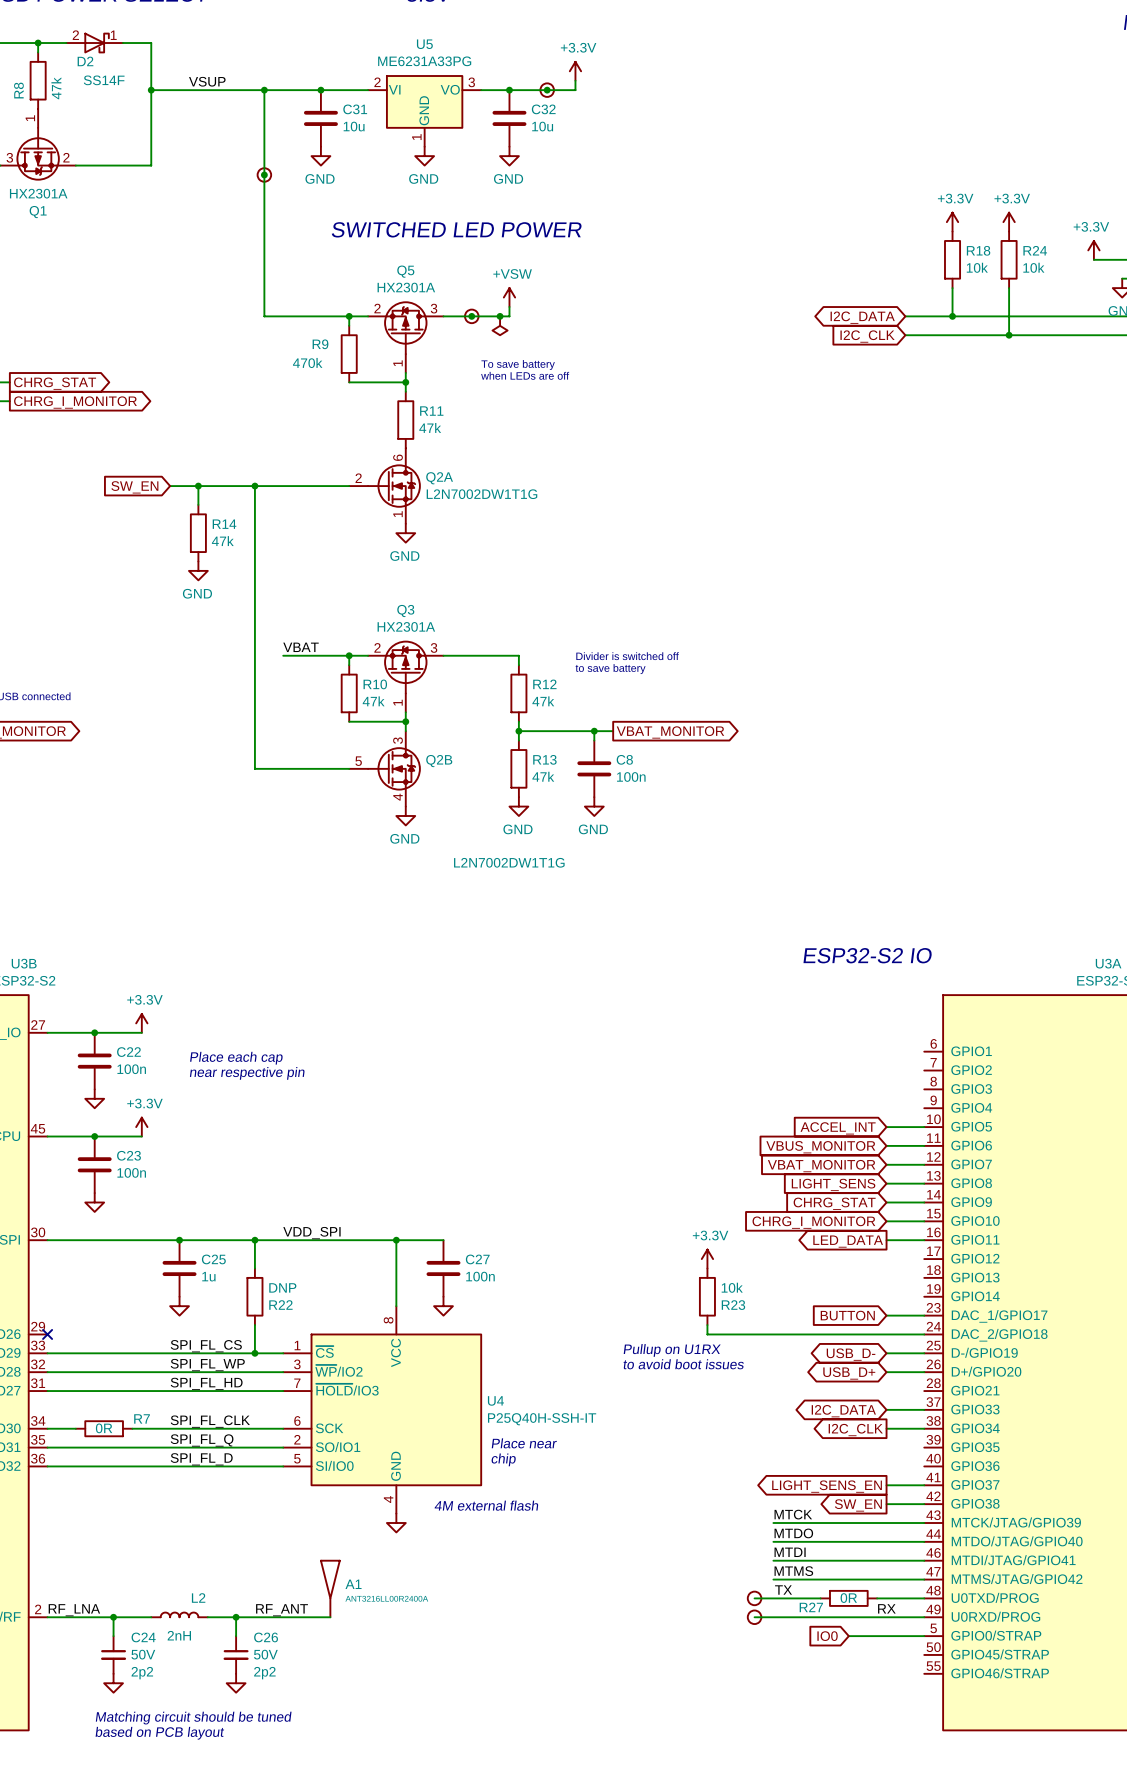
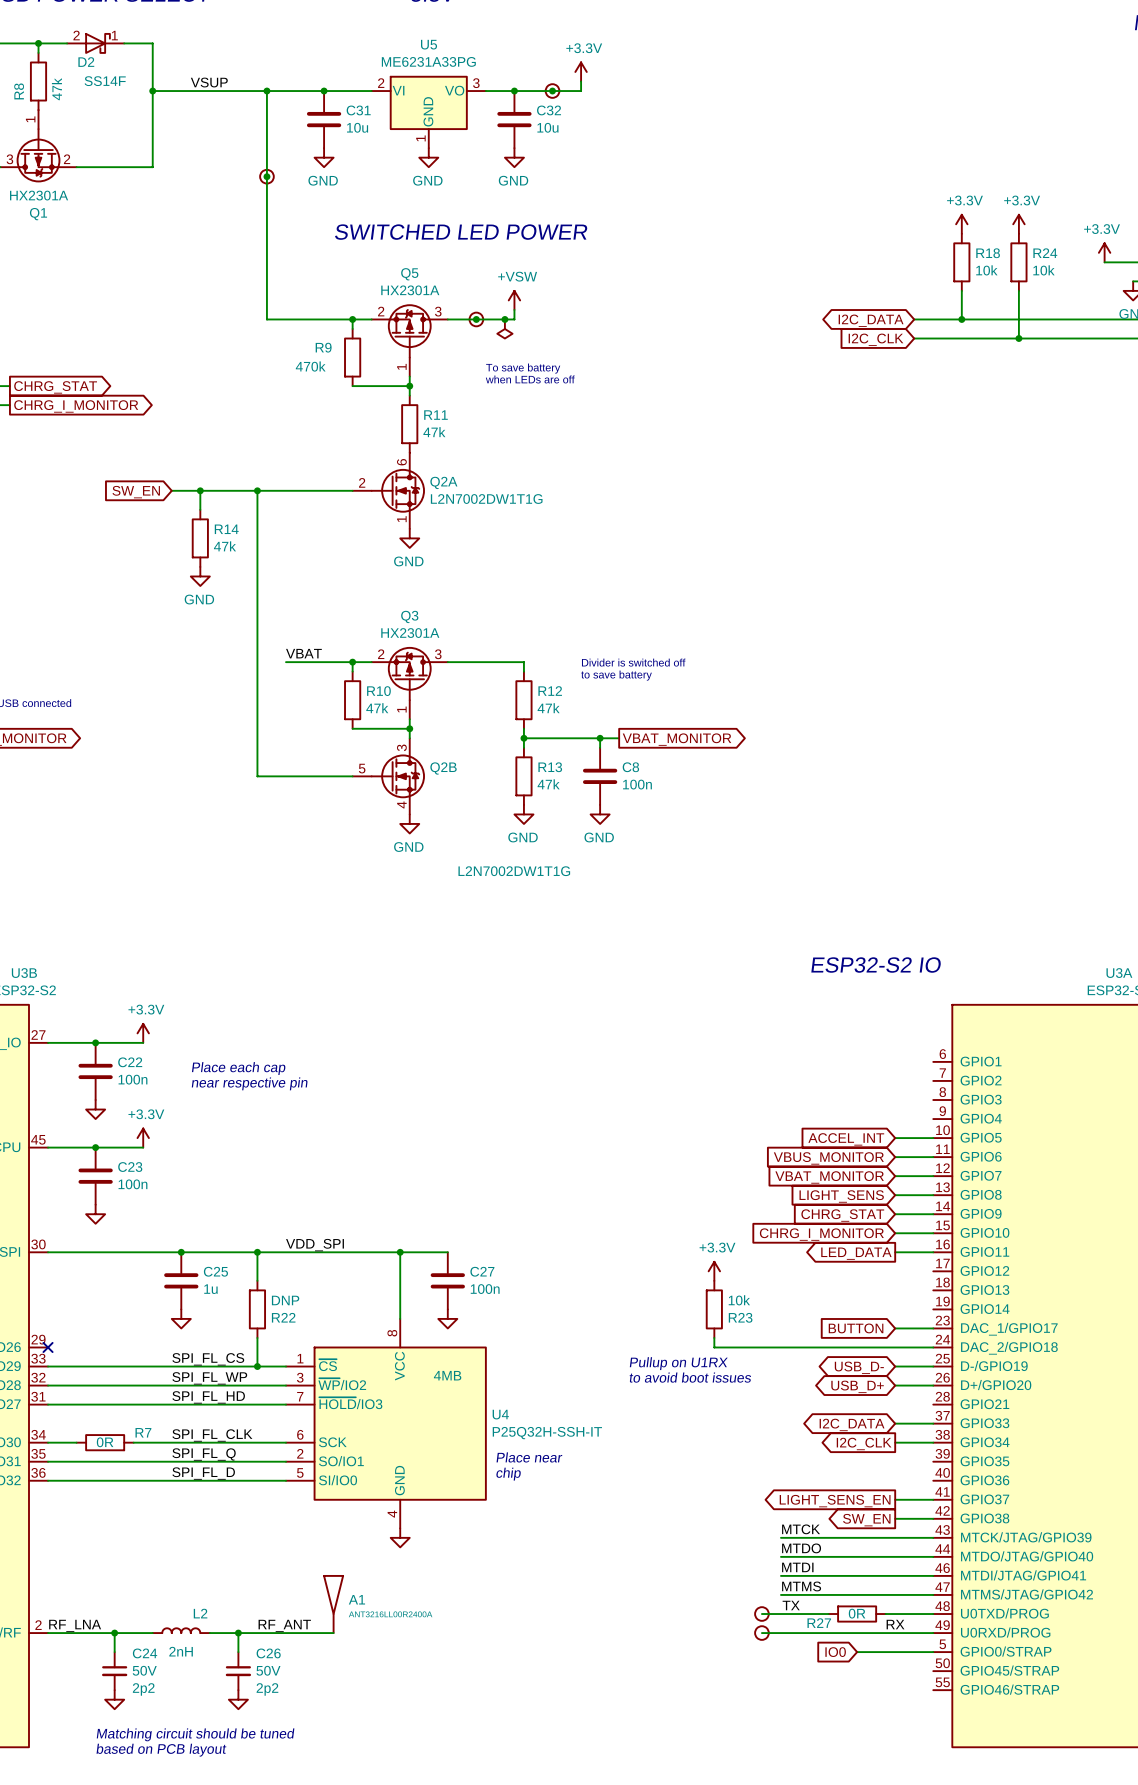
U4 text: none -> 4MB (447, 1375)
U4 value: P25Q40H-SSH-IT (542, 1419) -> P25Q32H-SSH-IT (547, 1433)
text: 4M external flash (486, 1505) -> none

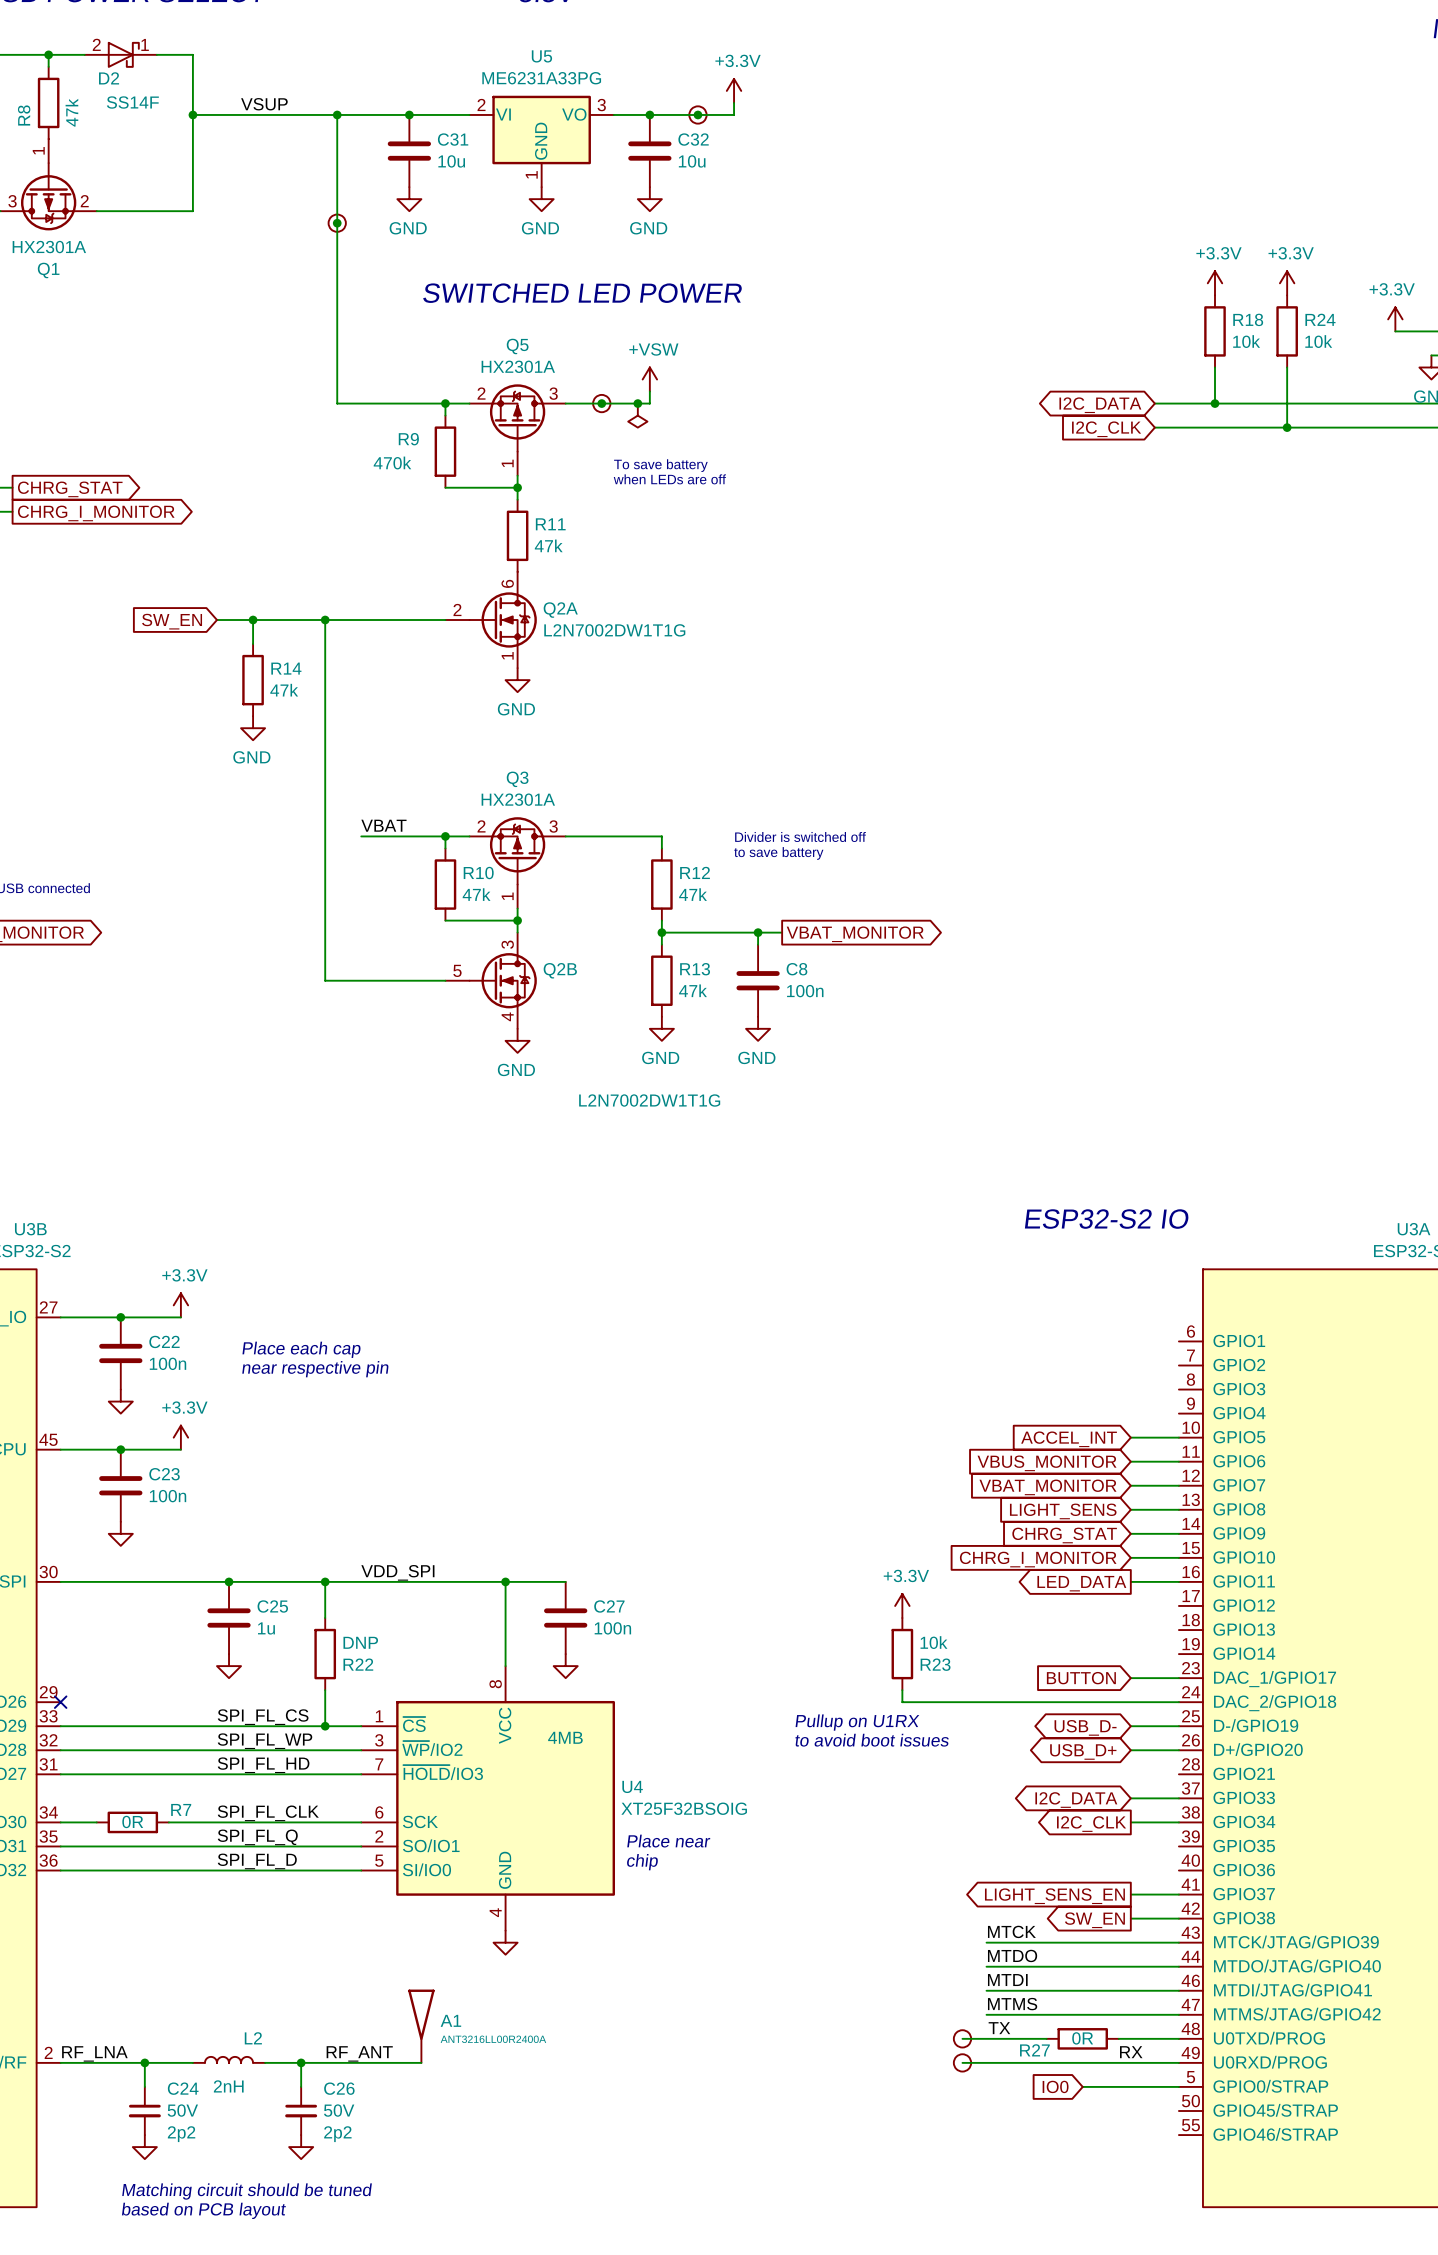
U4 value: P25Q32H-SSH-IT (547, 1433) -> XT25F32BSOIG (684, 1808)

